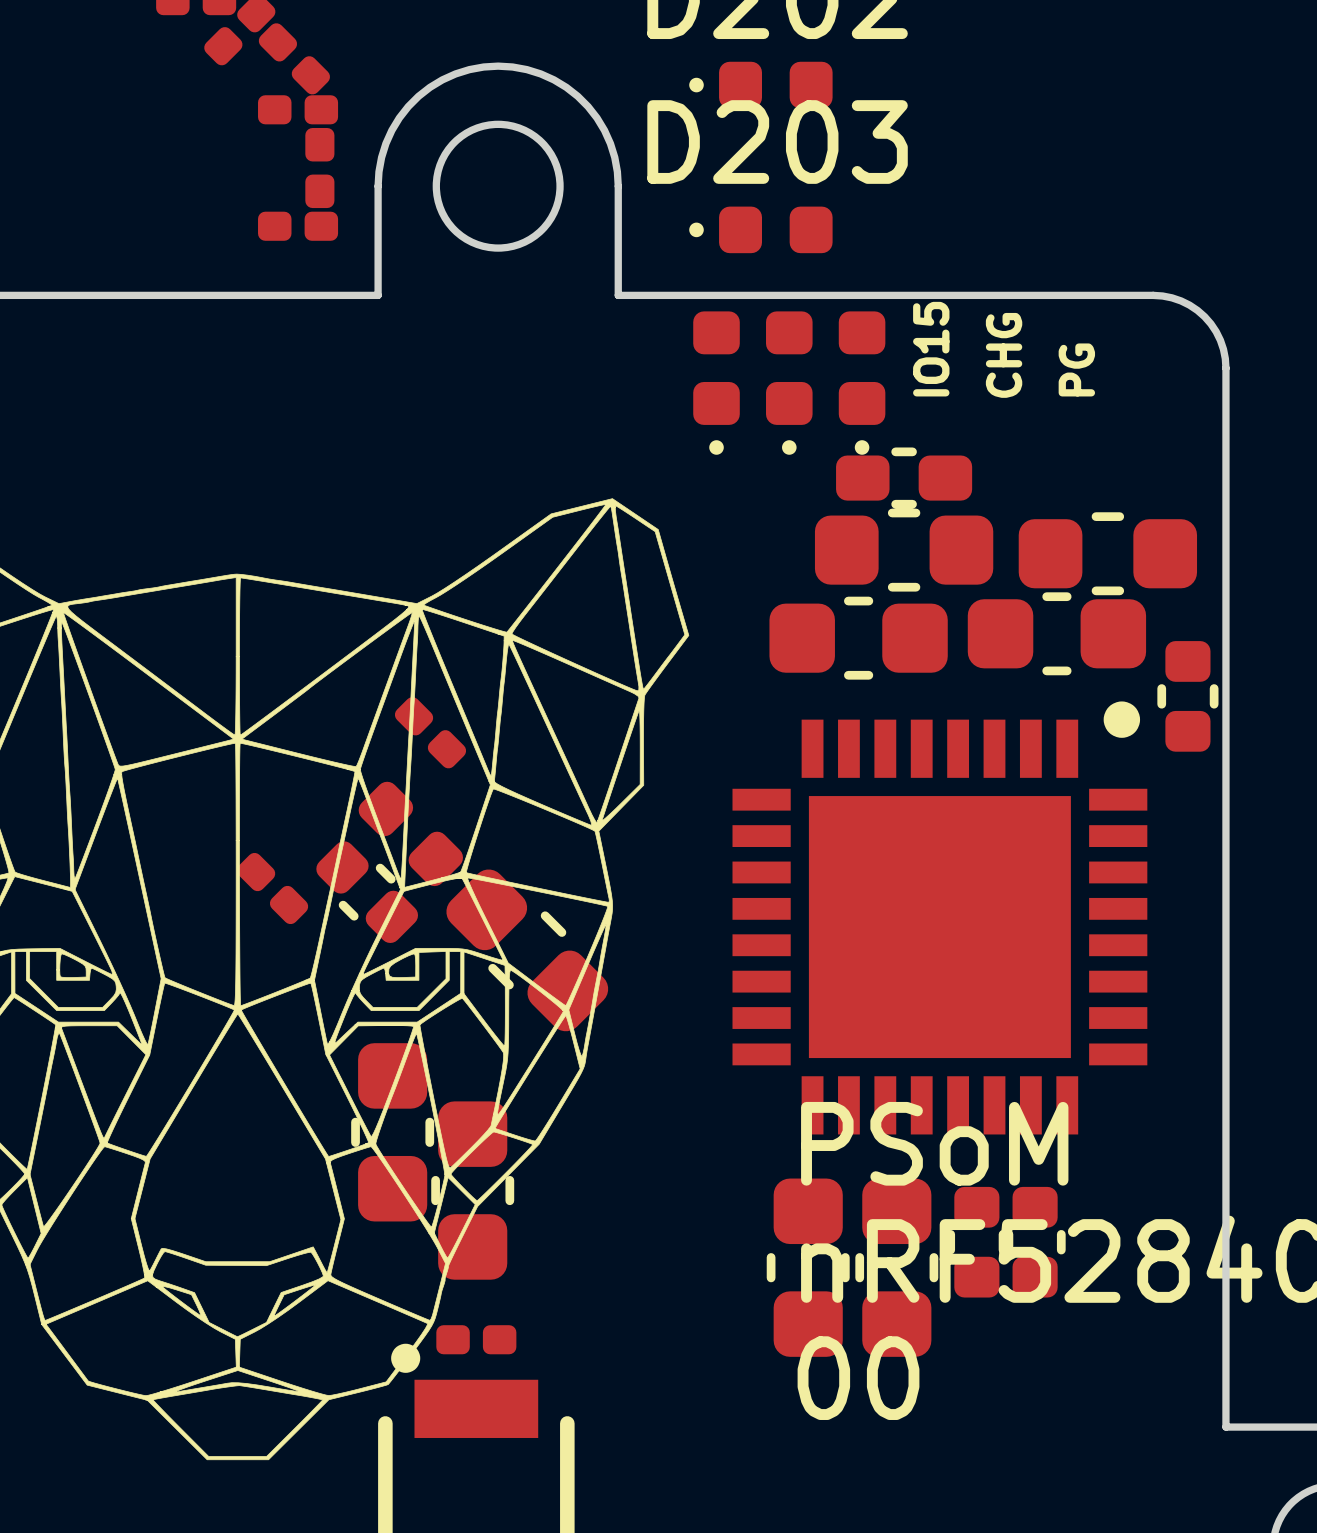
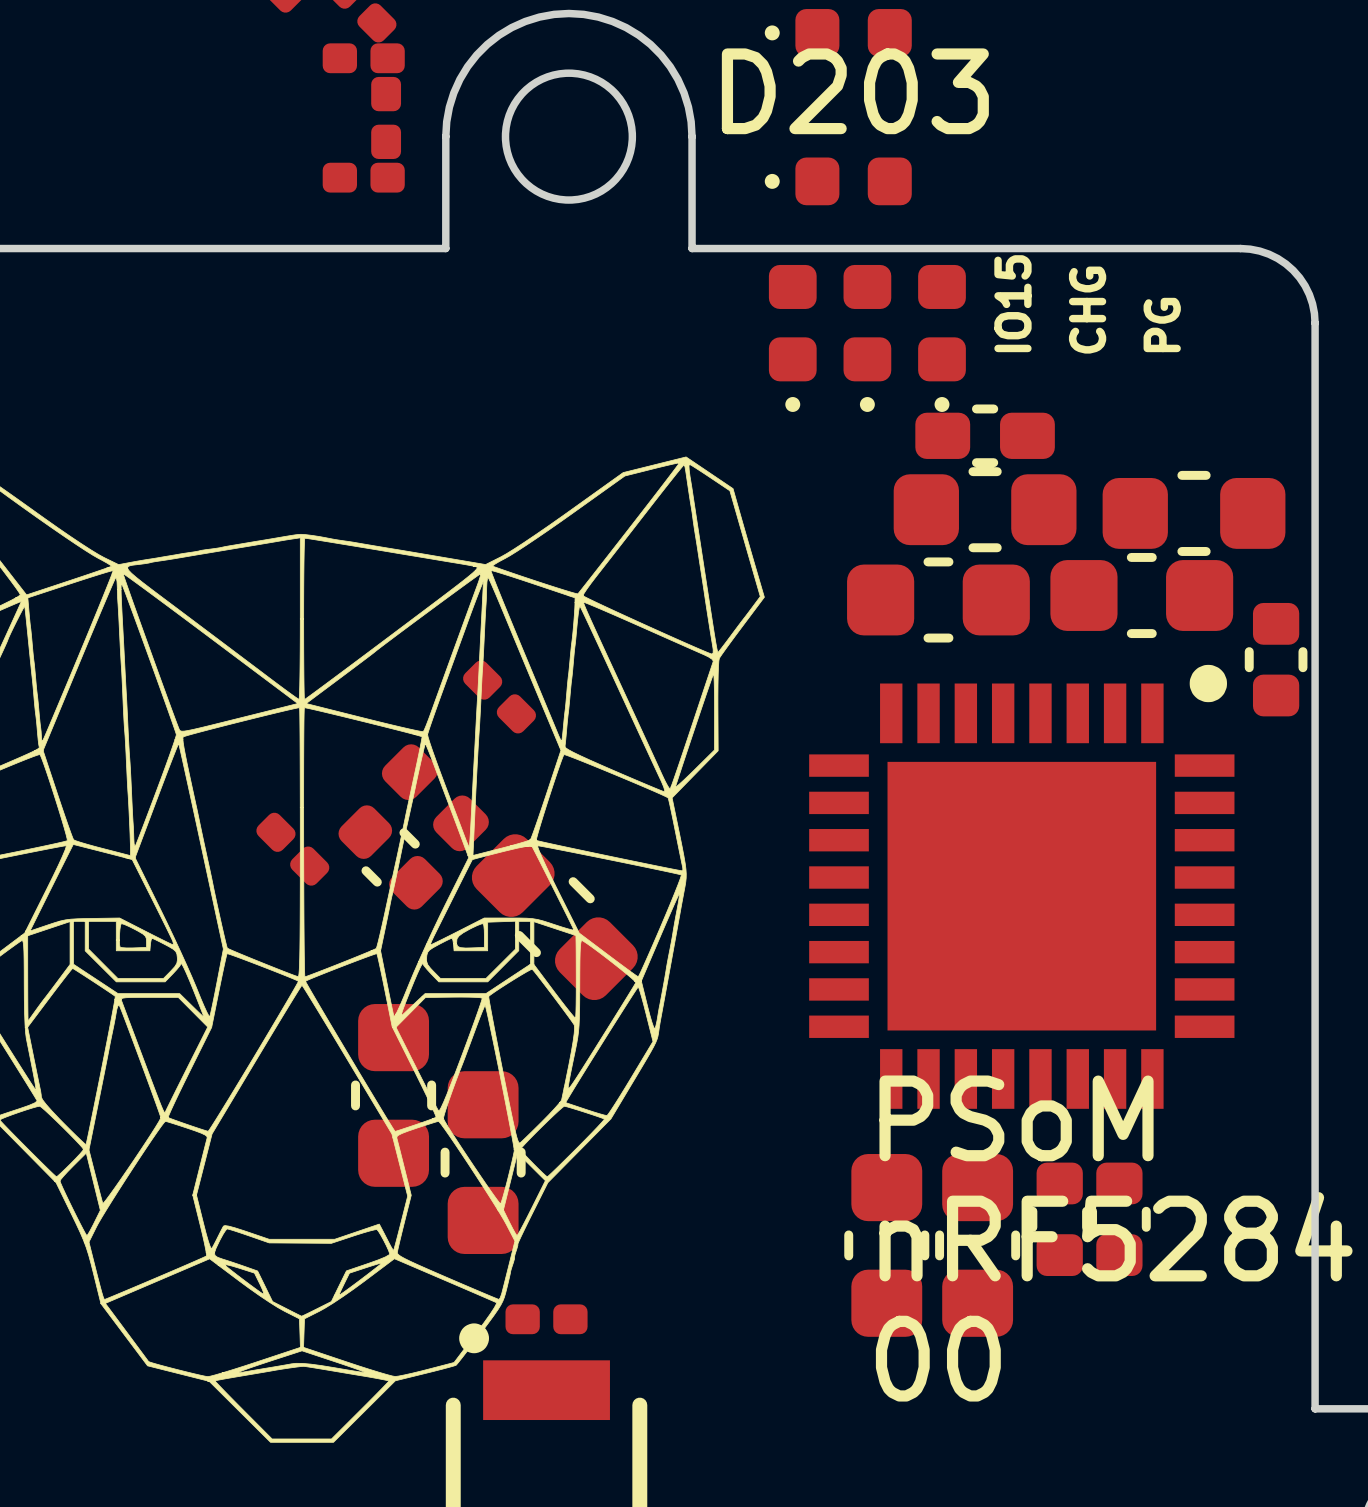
part position: (410, 833) -> (435, 797)
part position: (272, 888) -> (292, 849)
part position: (367, 892) -> (390, 857)
part position: (527, 950) -> (554, 917)
part: none -> (393, 1095)
part: (392, 1132) -> none
part: none -> (483, 1162)
part: (472, 1190) -> none

